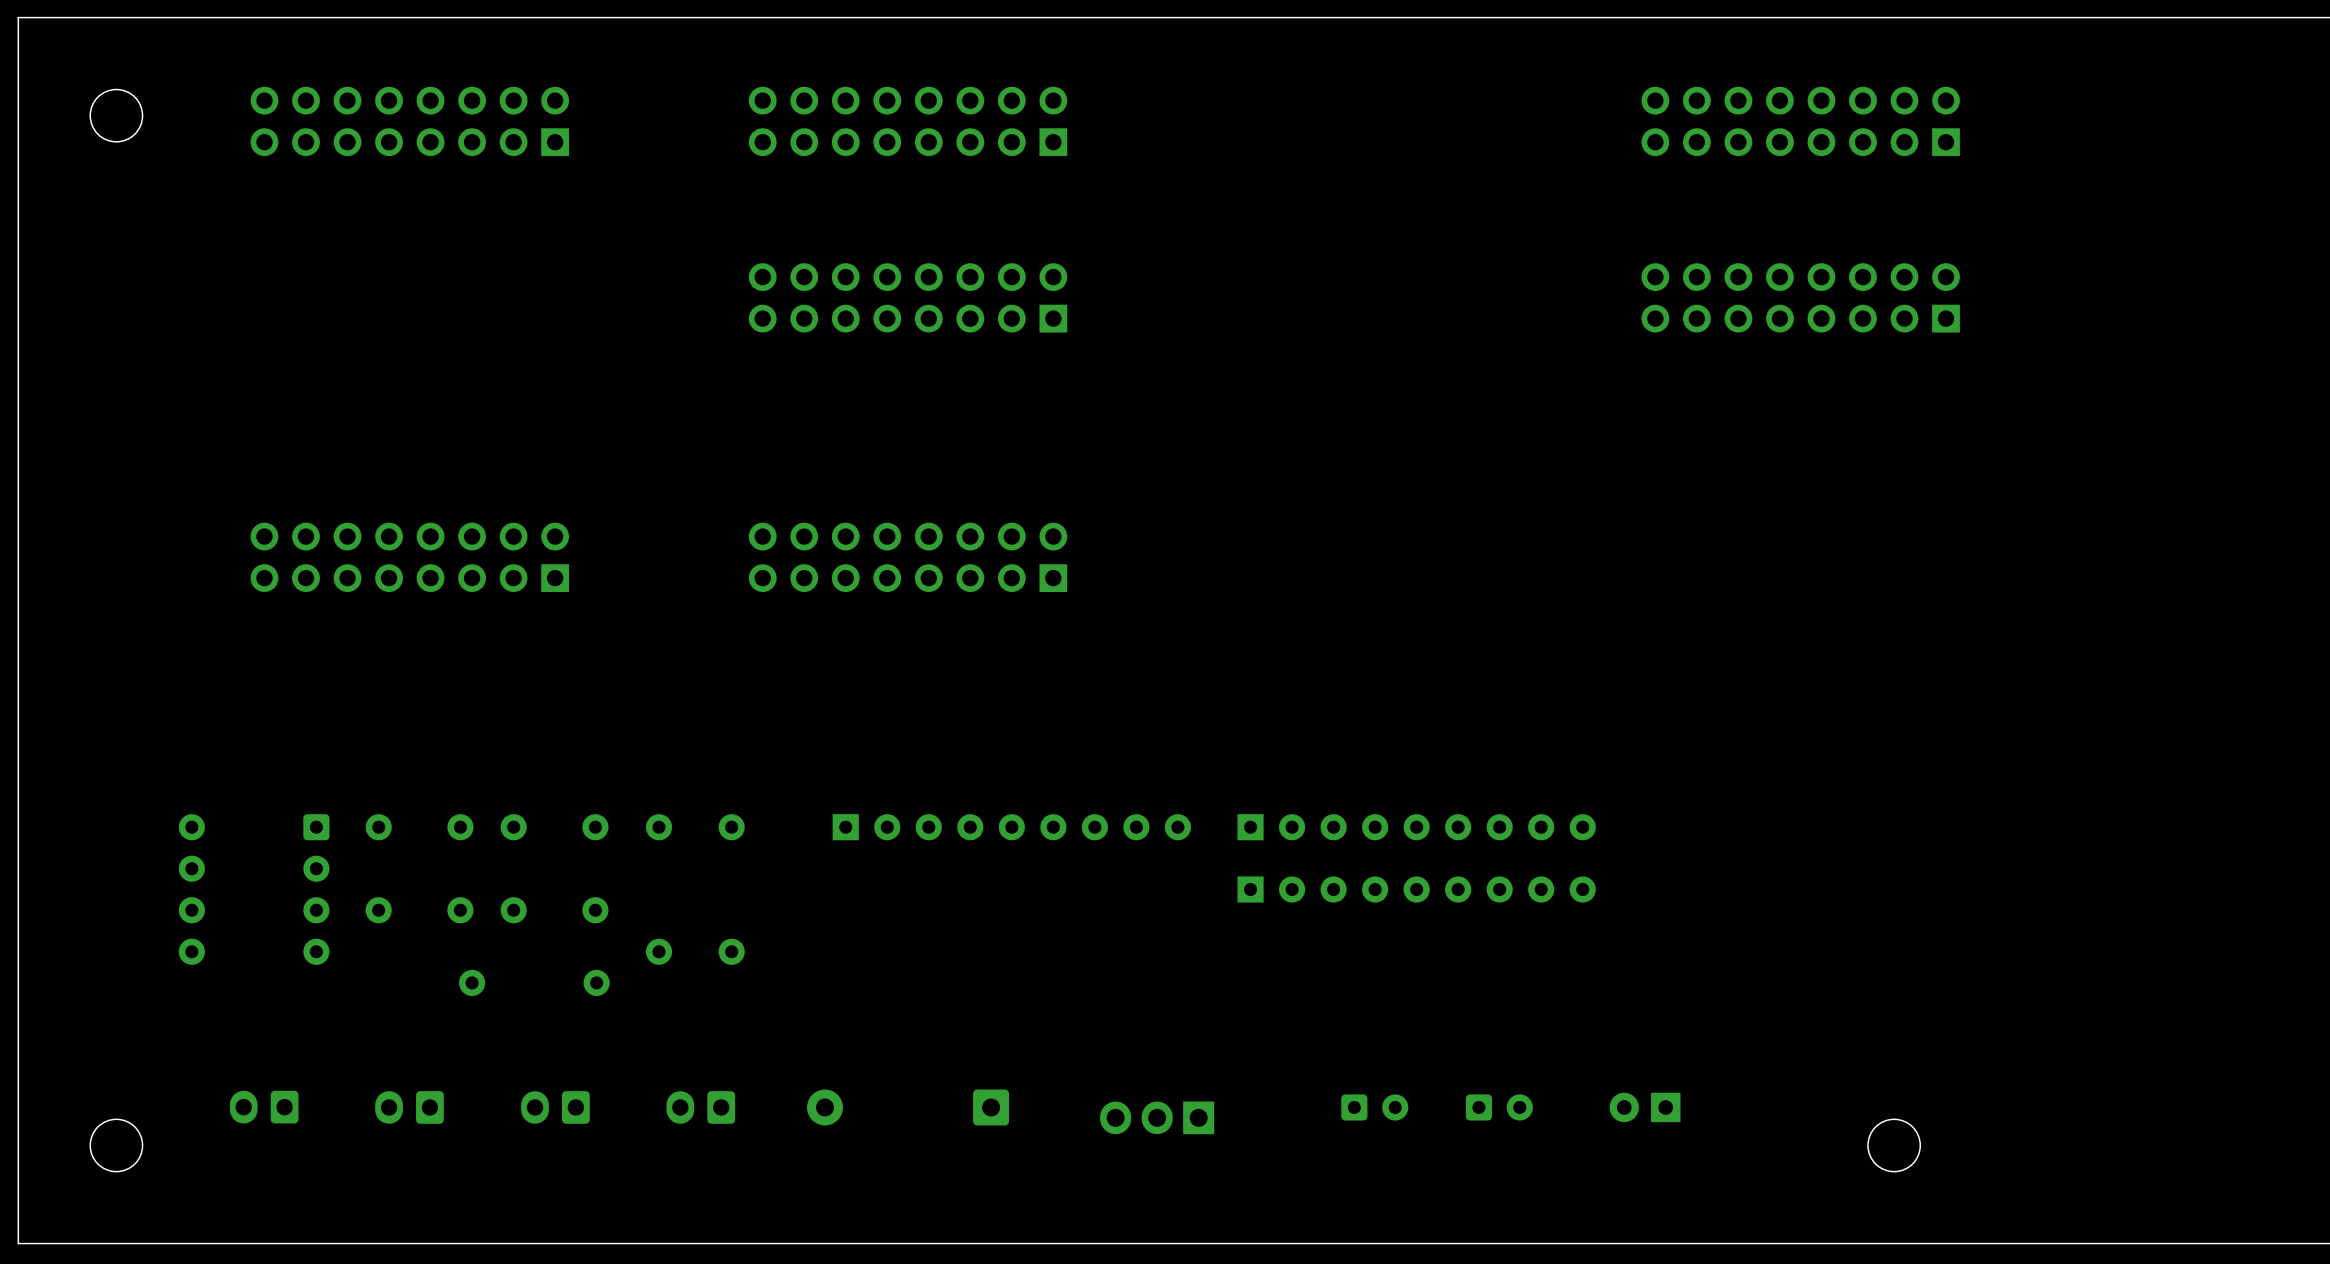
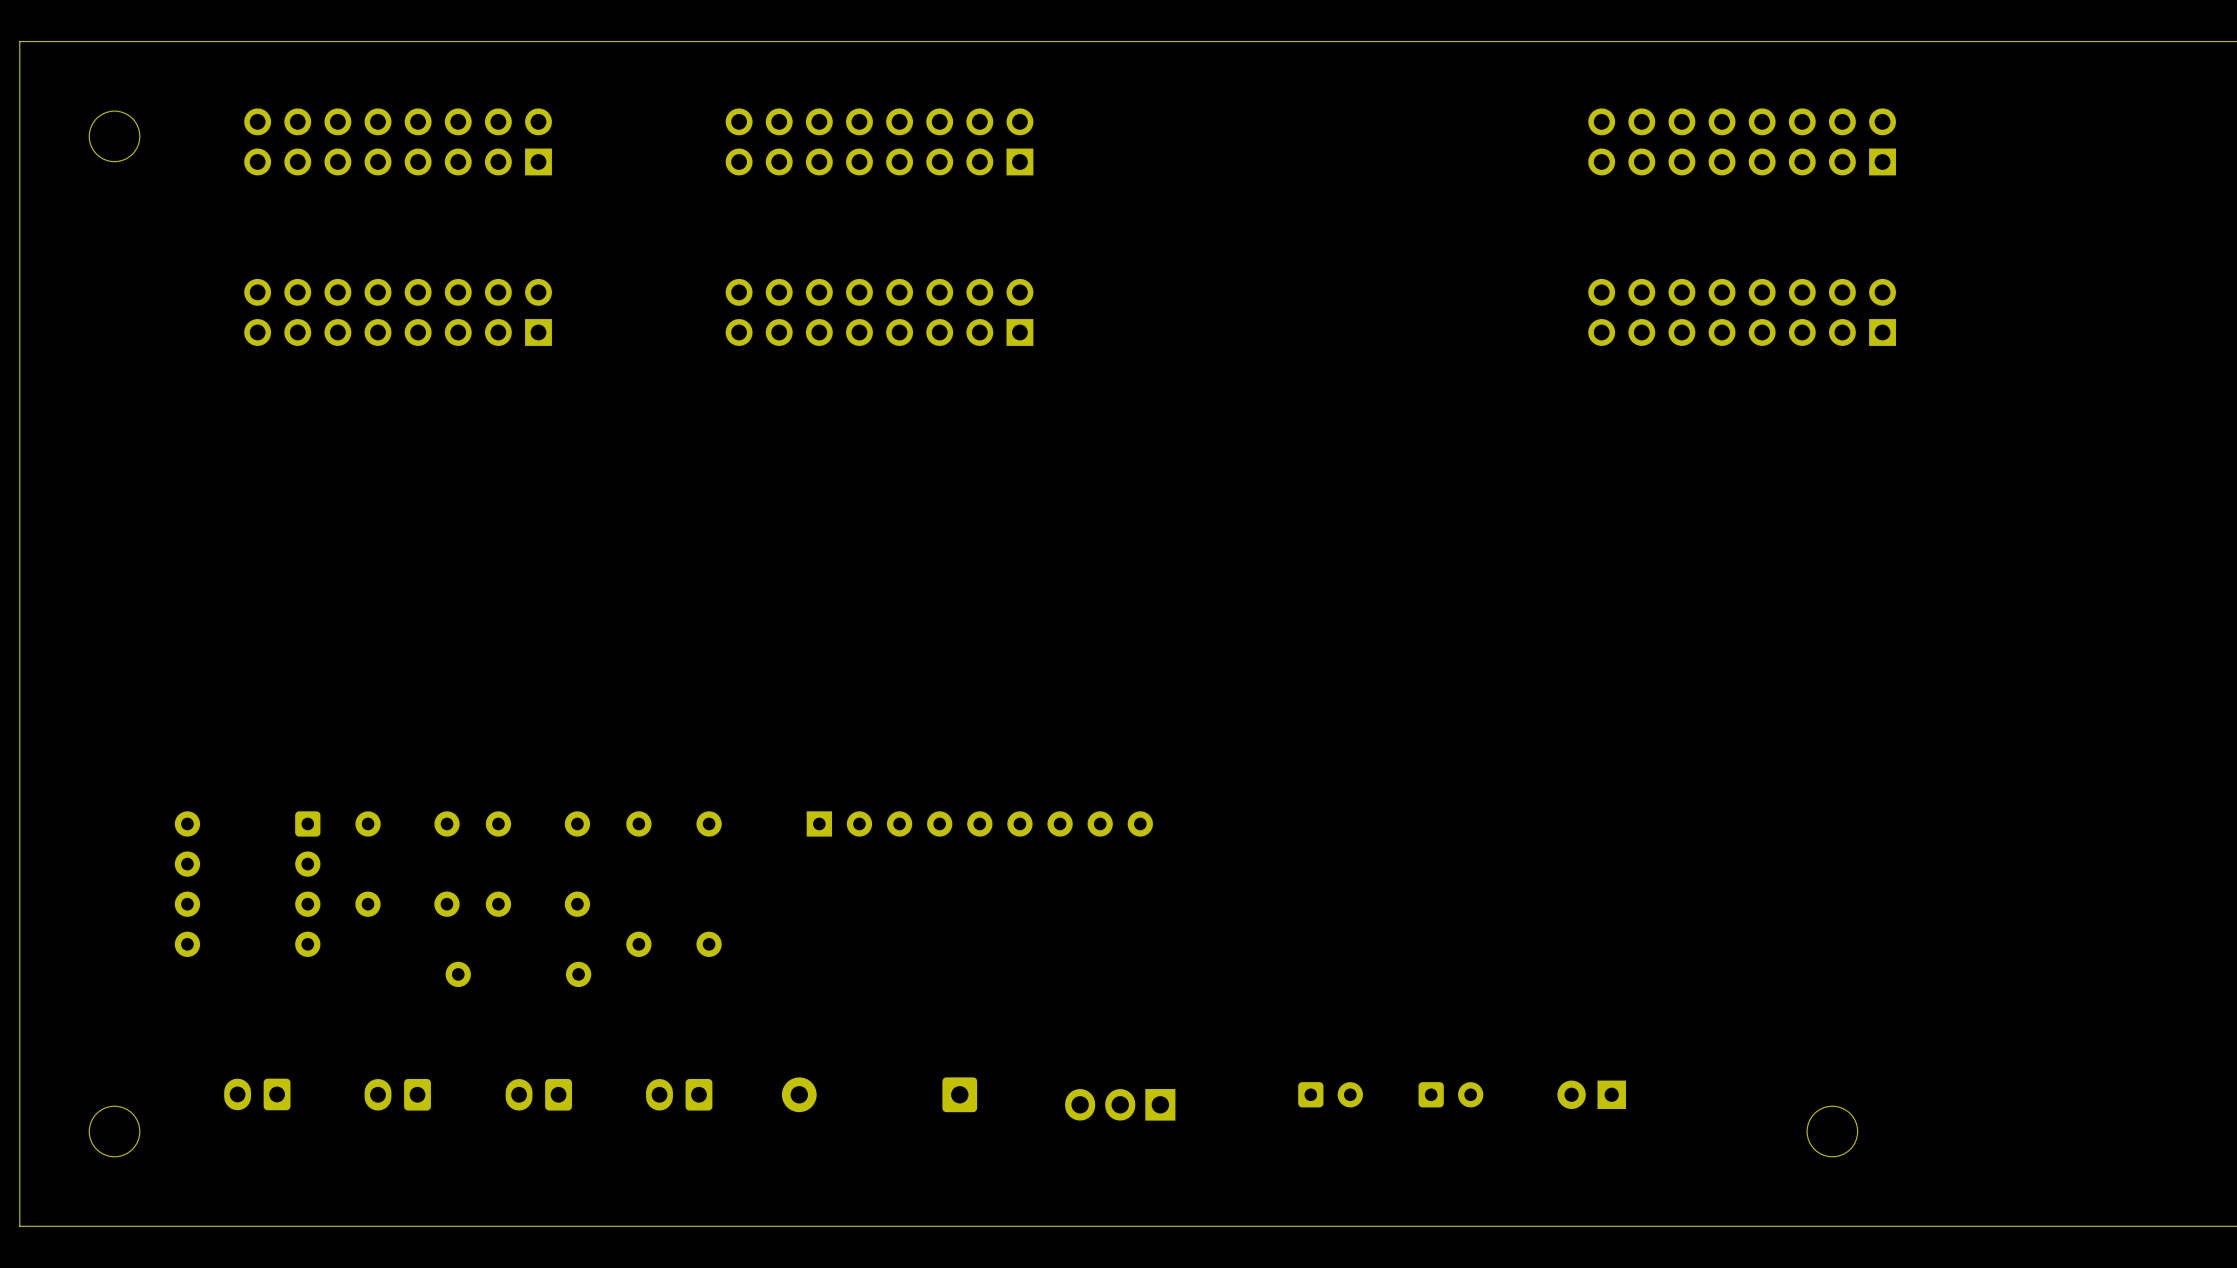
part position: (409, 557) -> (398, 312)
part: (908, 557) -> none
part: (1416, 827) -> none
part: (1416, 889) -> none

